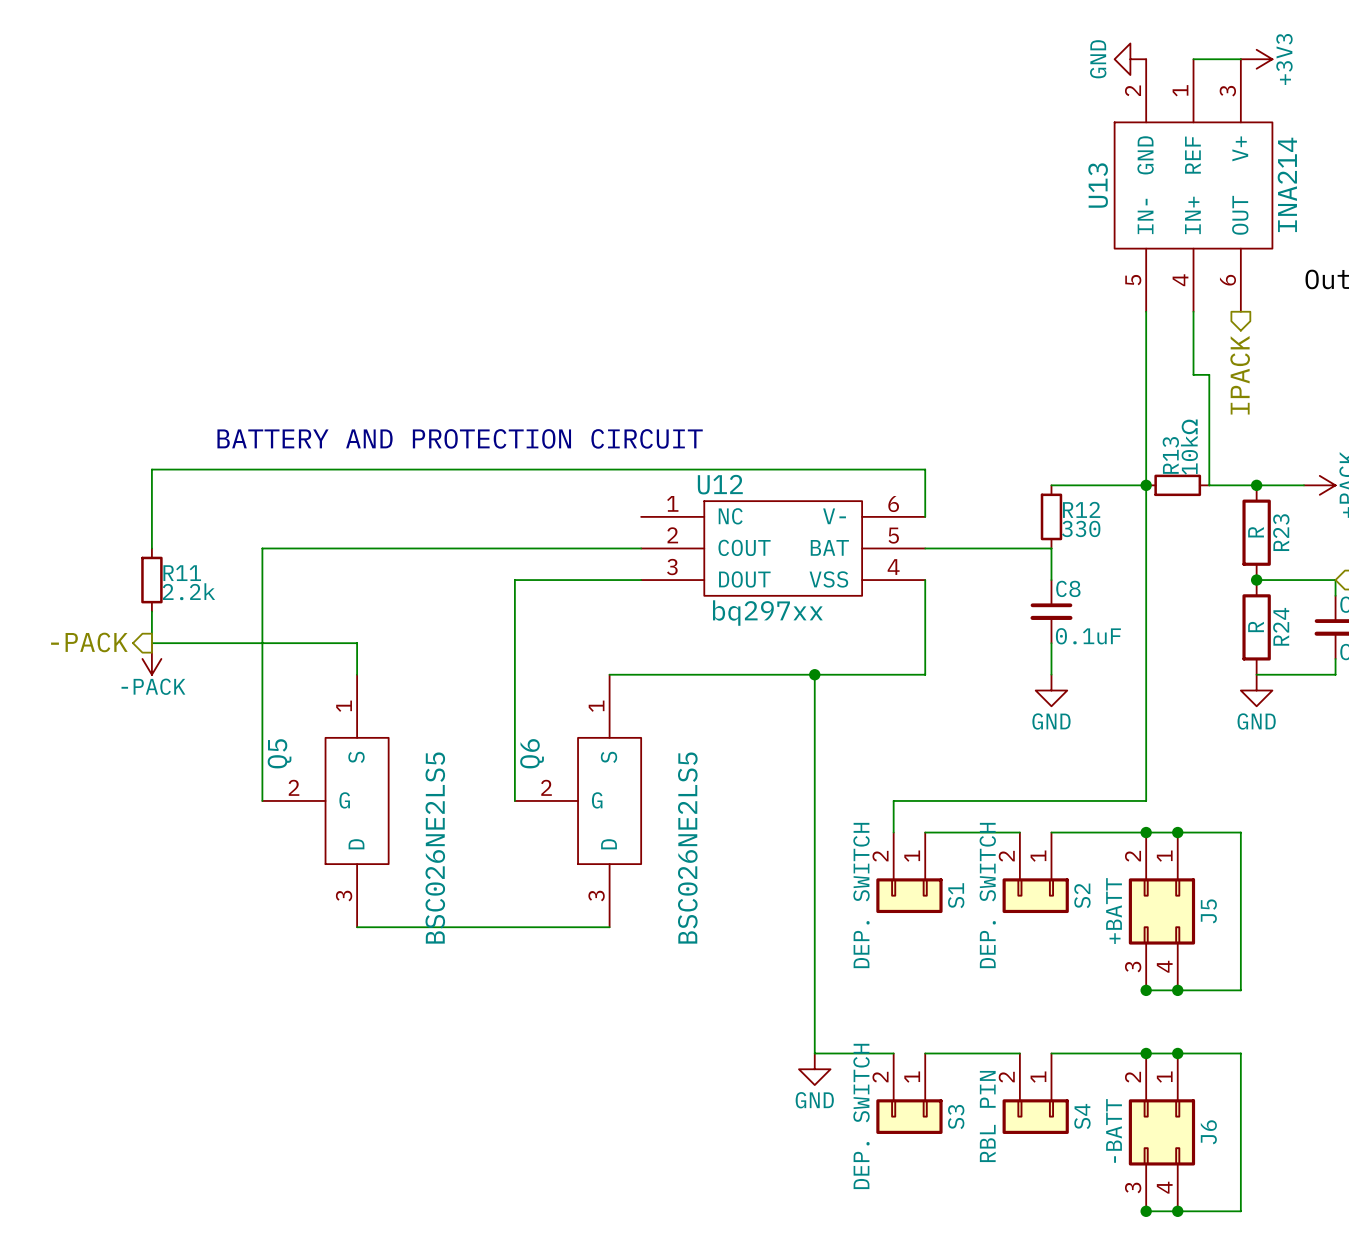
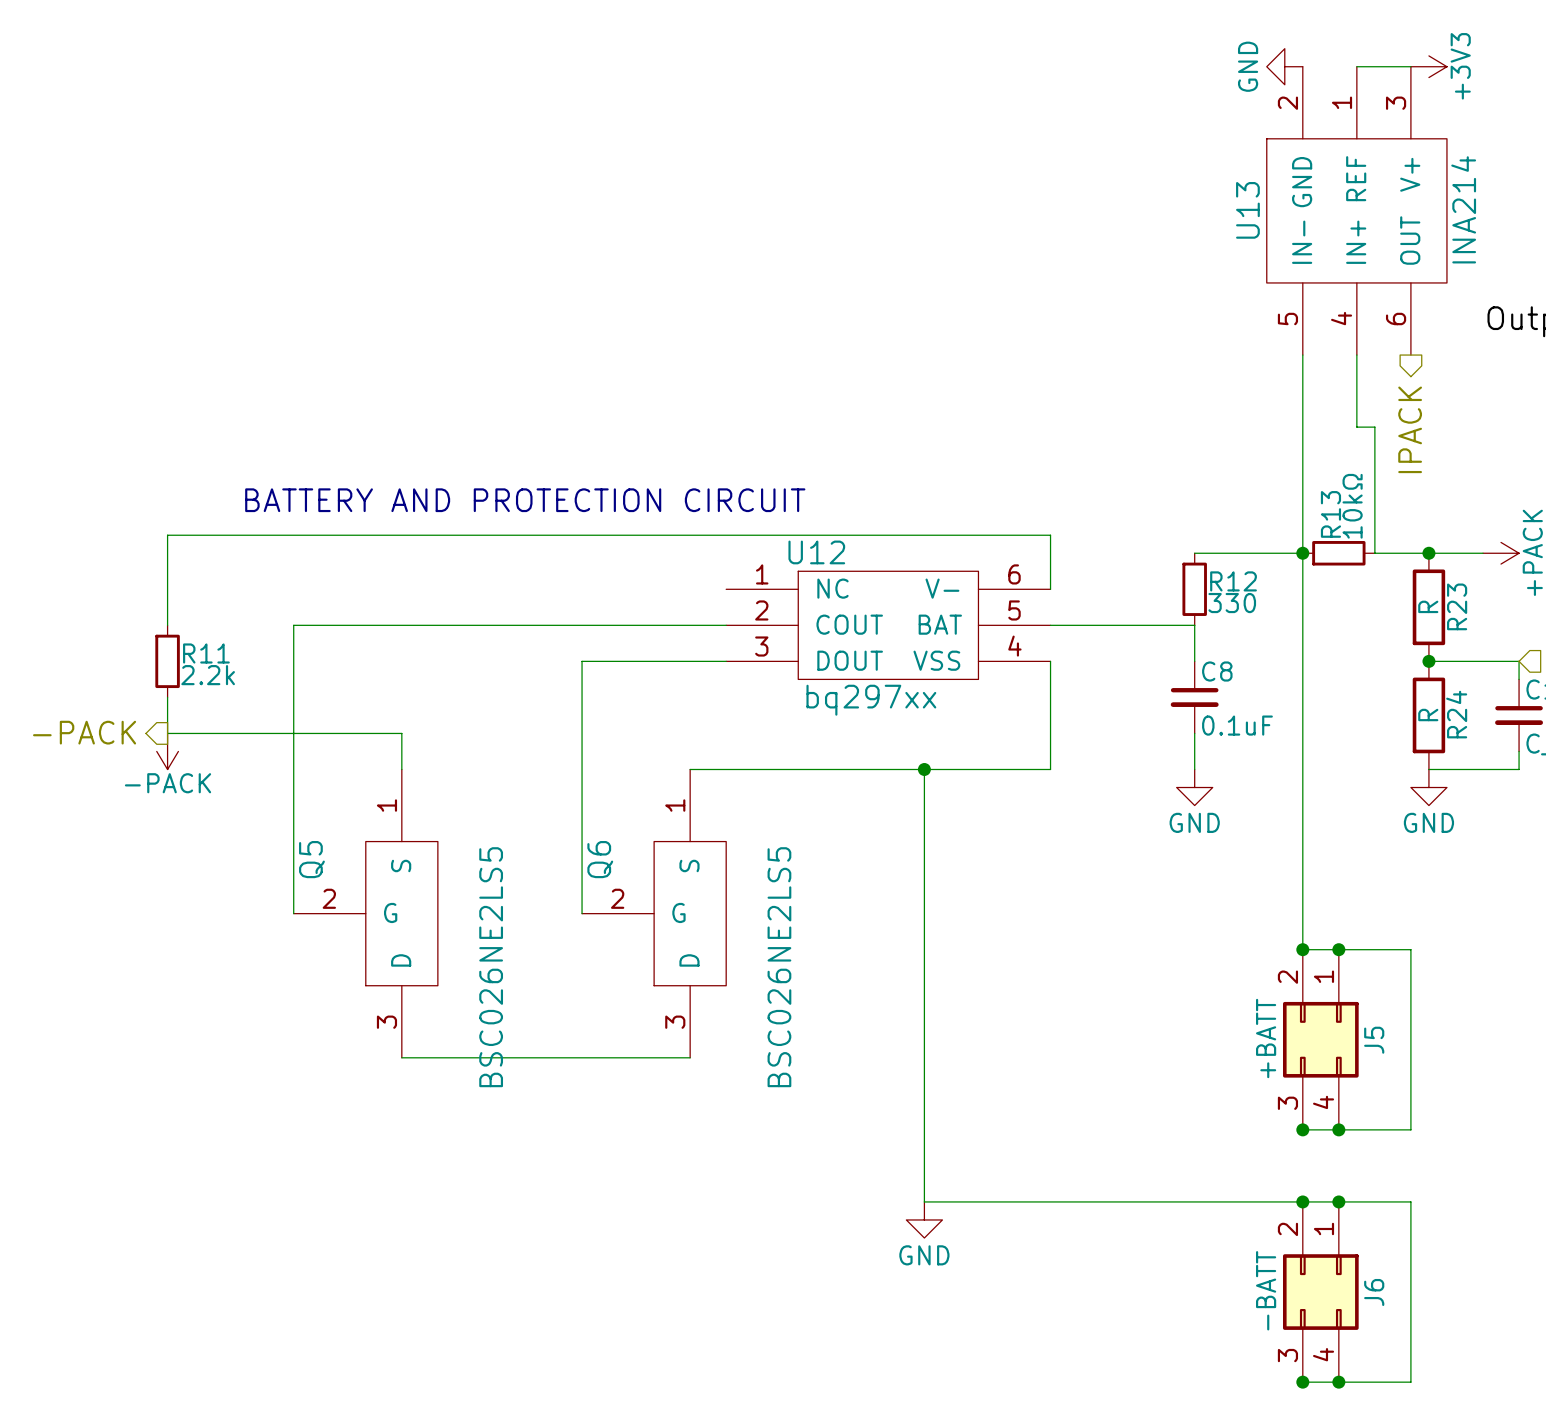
wire: (1146, 800) (893, 800) (893, 832) -> none
wire: (925, 832) (1019, 832) -> none
wire: (1051, 832) (1146, 832) -> (1302, 913) (1302, 949)
S1: DEP. SWITCH (909, 872) -> none
S2: DEP. SWITCH (1035, 872) -> none
wire: none -> (1014, 1201) (1050, 1201)
wire: none -> (1158, 1201) (1194, 1201)
S3: DEP. SWITCH (909, 1093) -> none
S4: RBL PIN (1035, 1093) -> none

